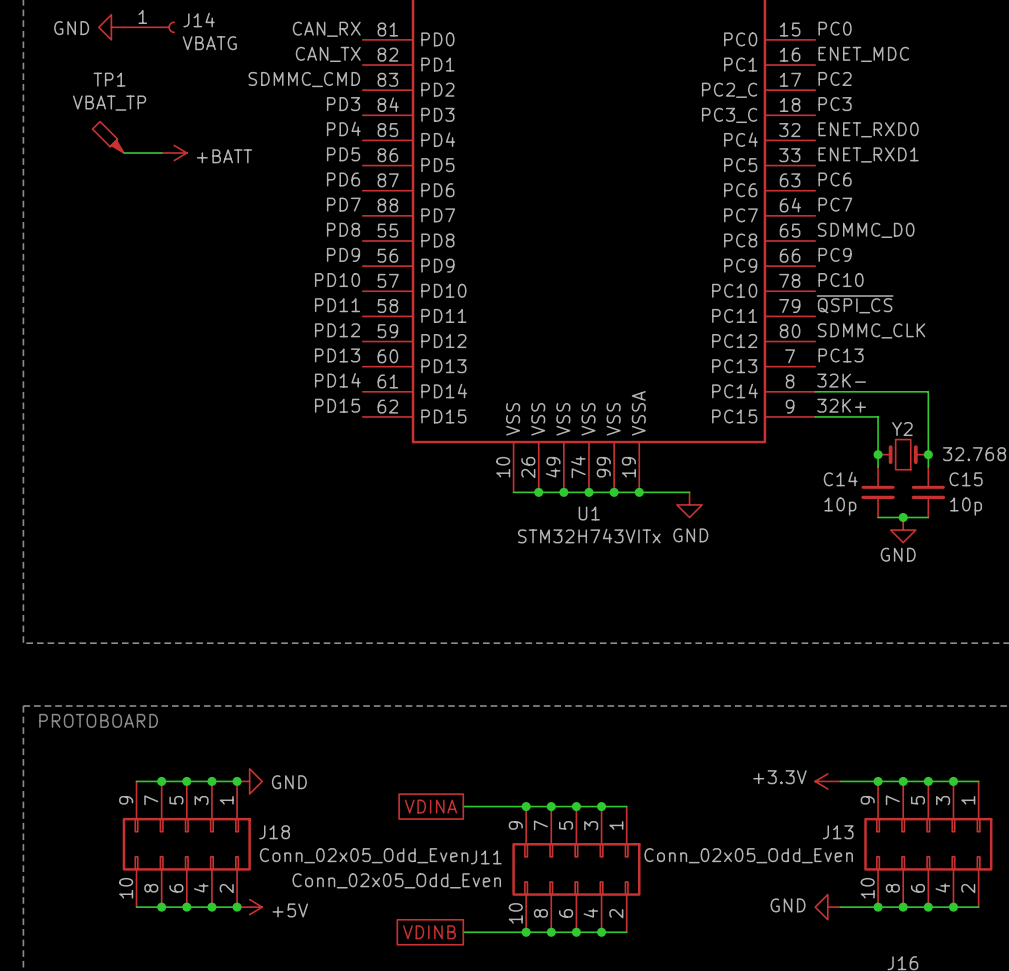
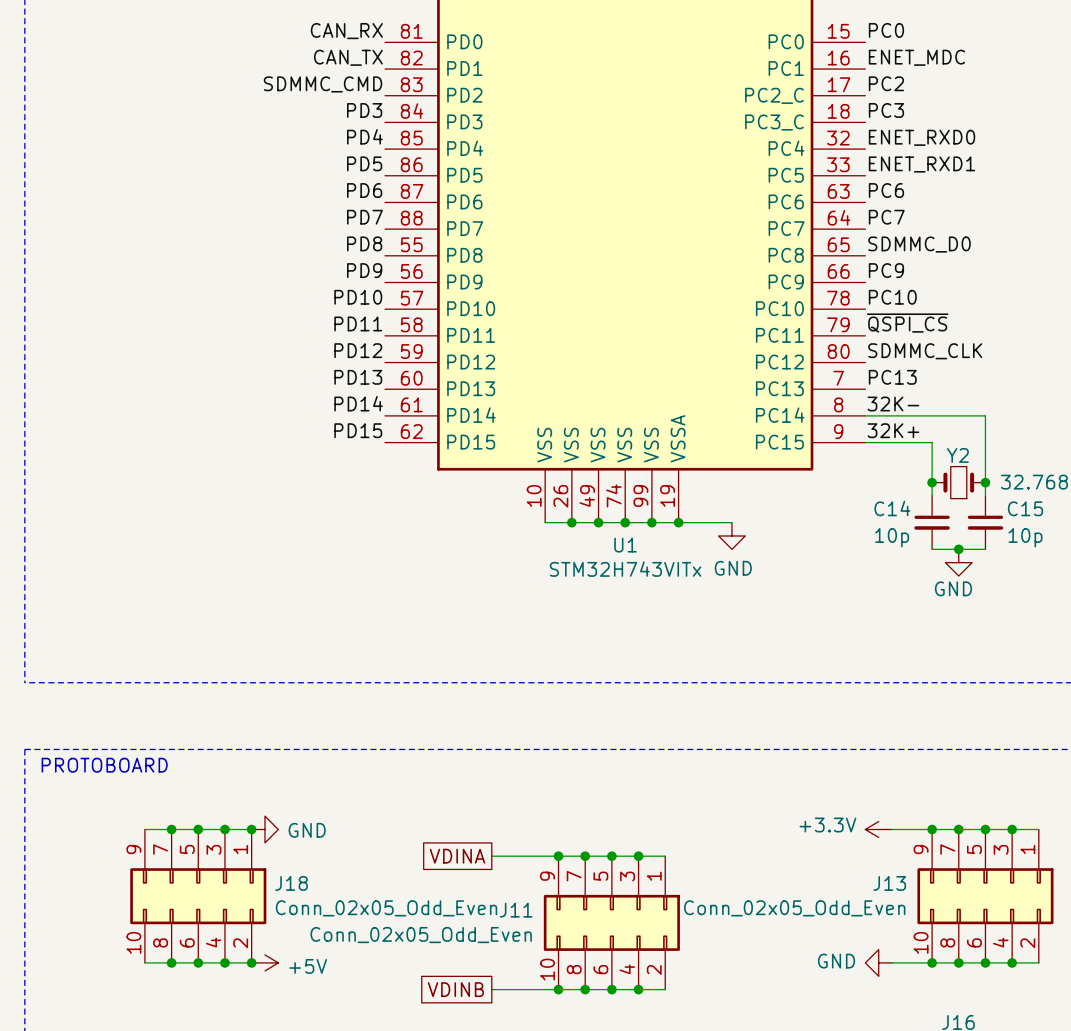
power symbol: GND (111, 27) -> none
J14: VBATG (149, 27) -> none
TP1: VBAT_TP (108, 137) -> none
wire: (123, 153) (161, 153) -> none
power symbol: +BATT (174, 153) -> none

